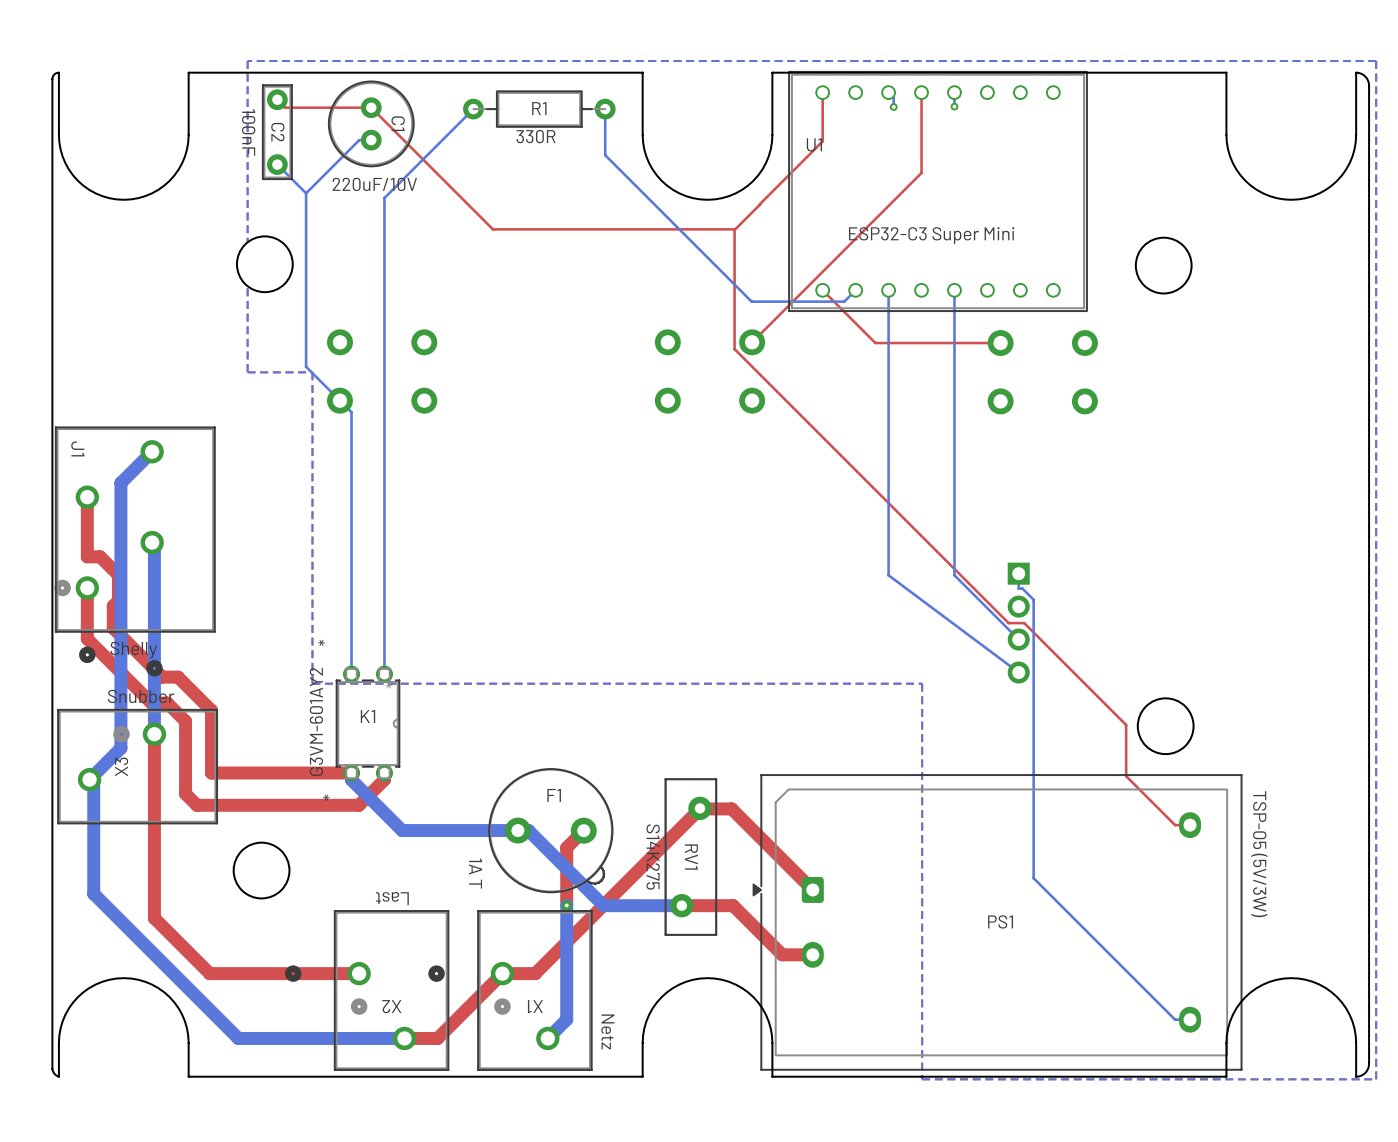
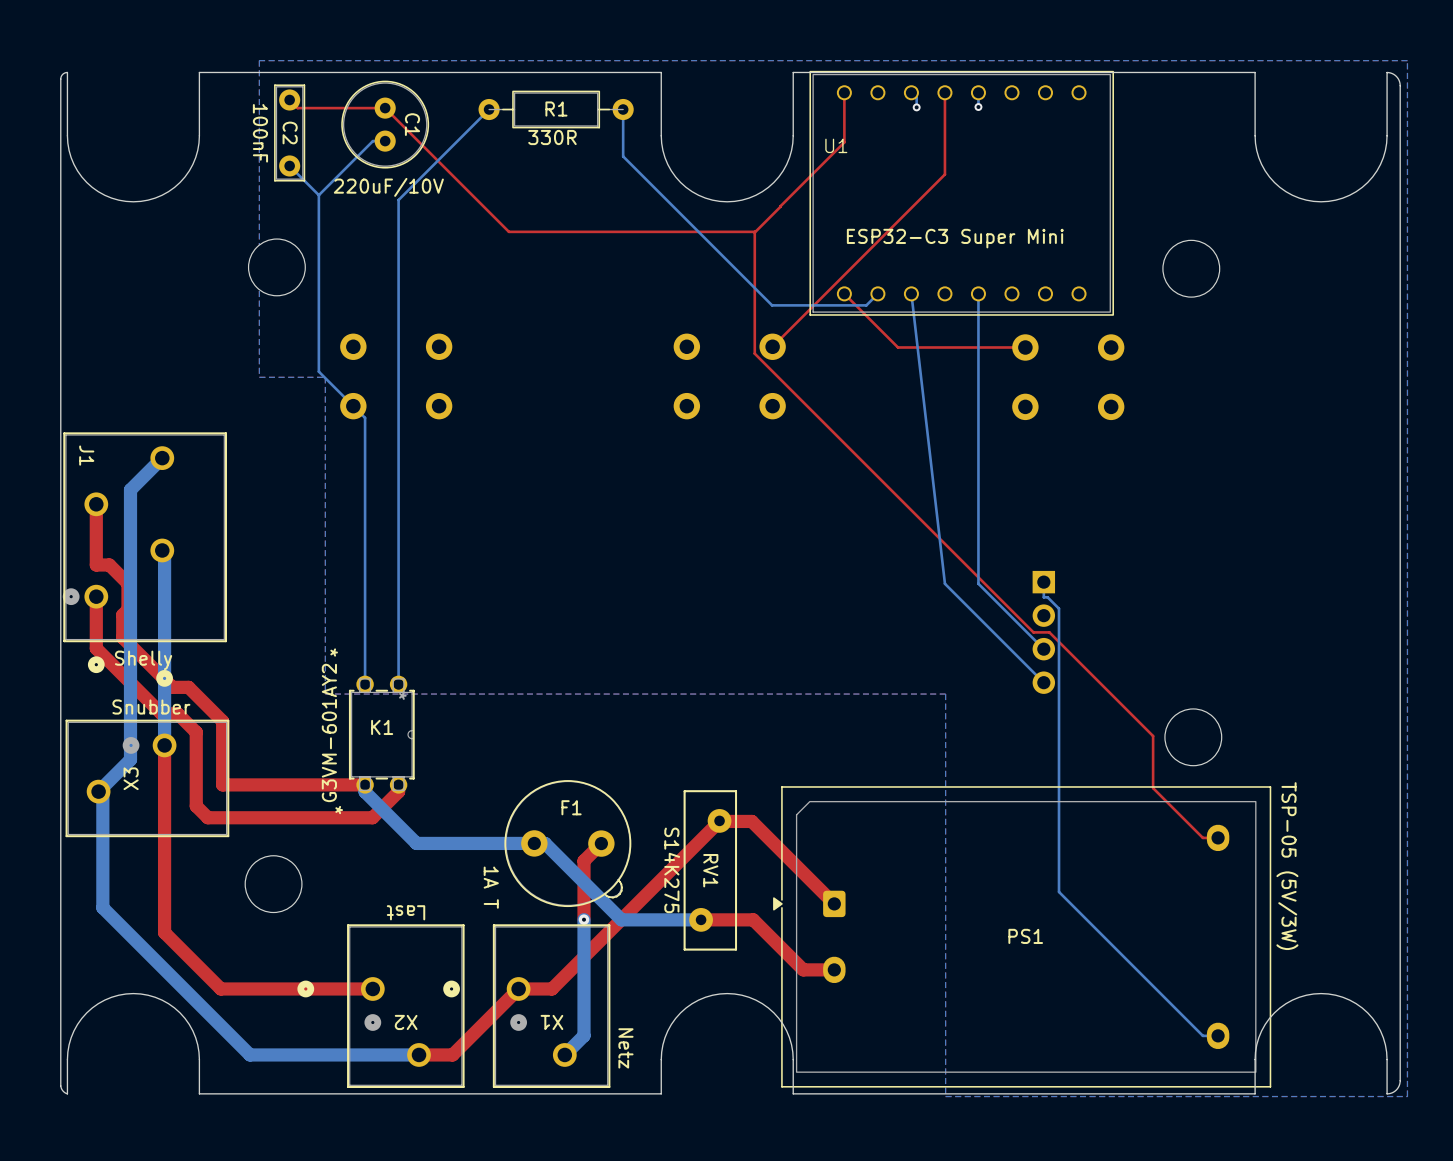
bottom track: (888, 290) (888, 575) (1018, 672) -> (911, 293) (944, 583) (1043, 682)

